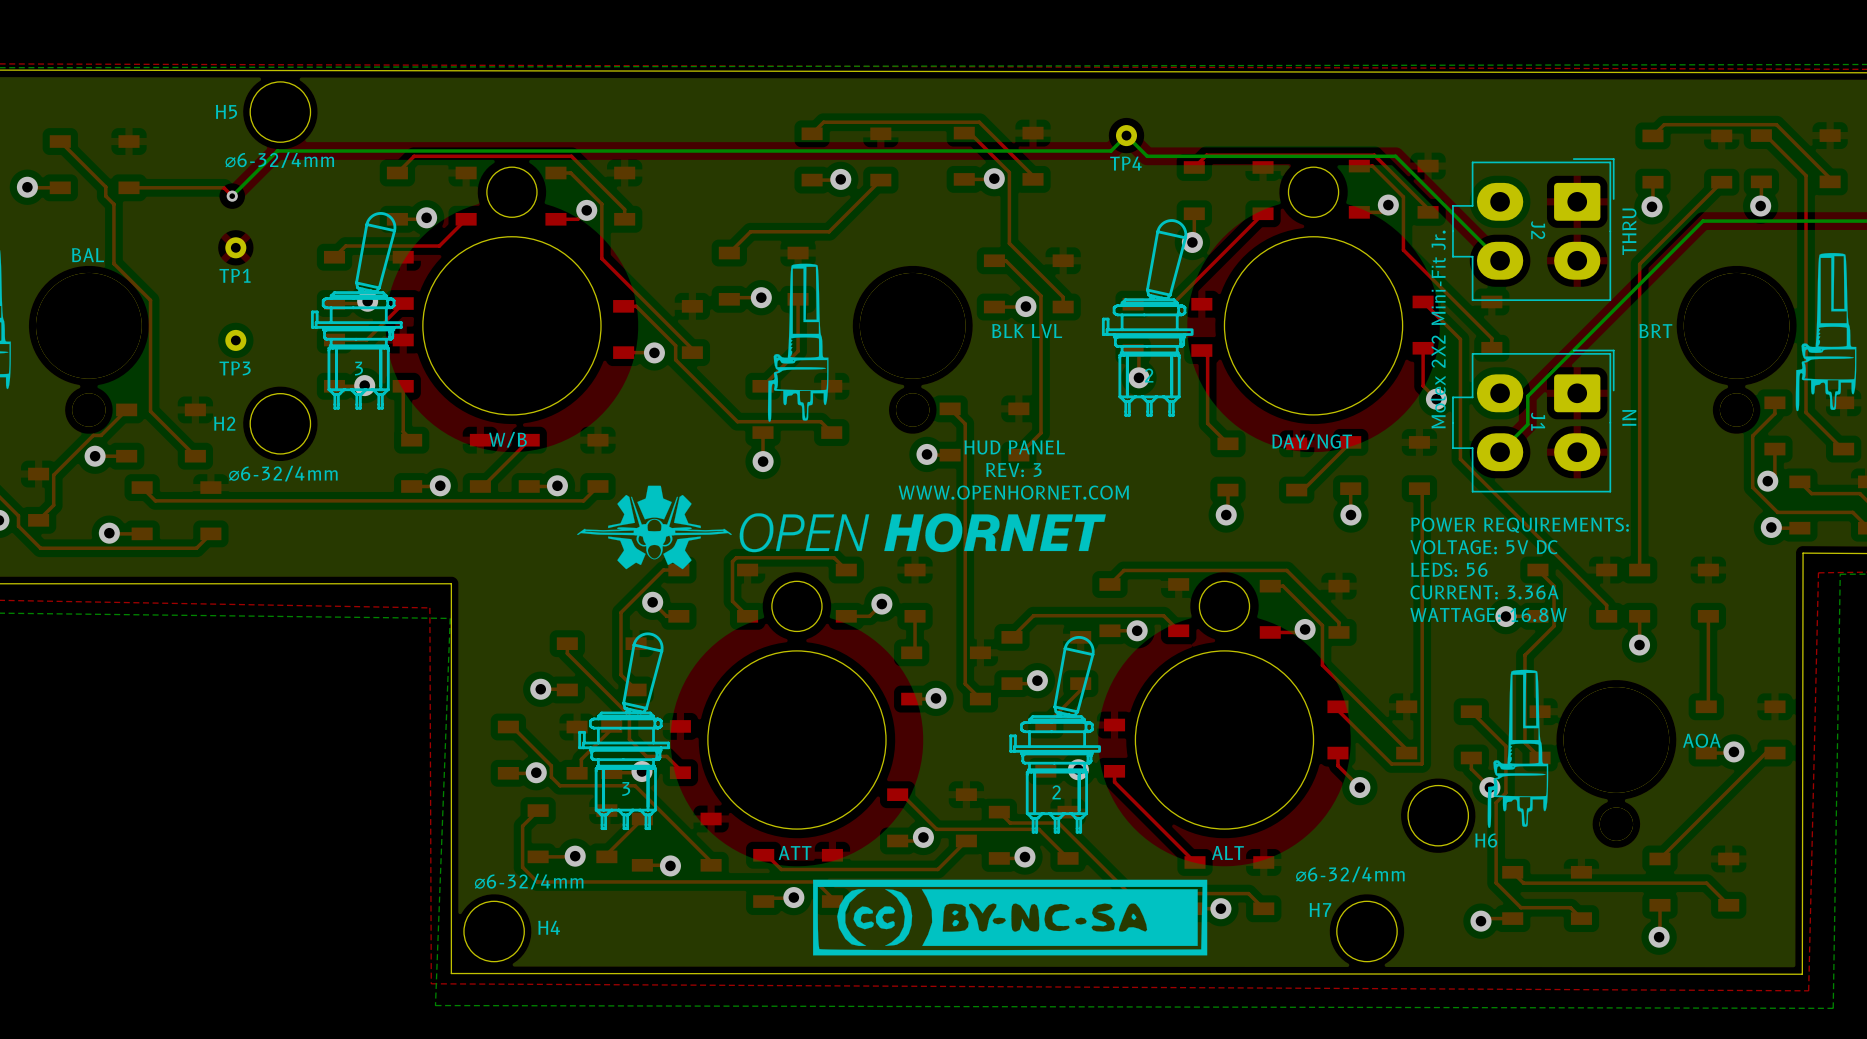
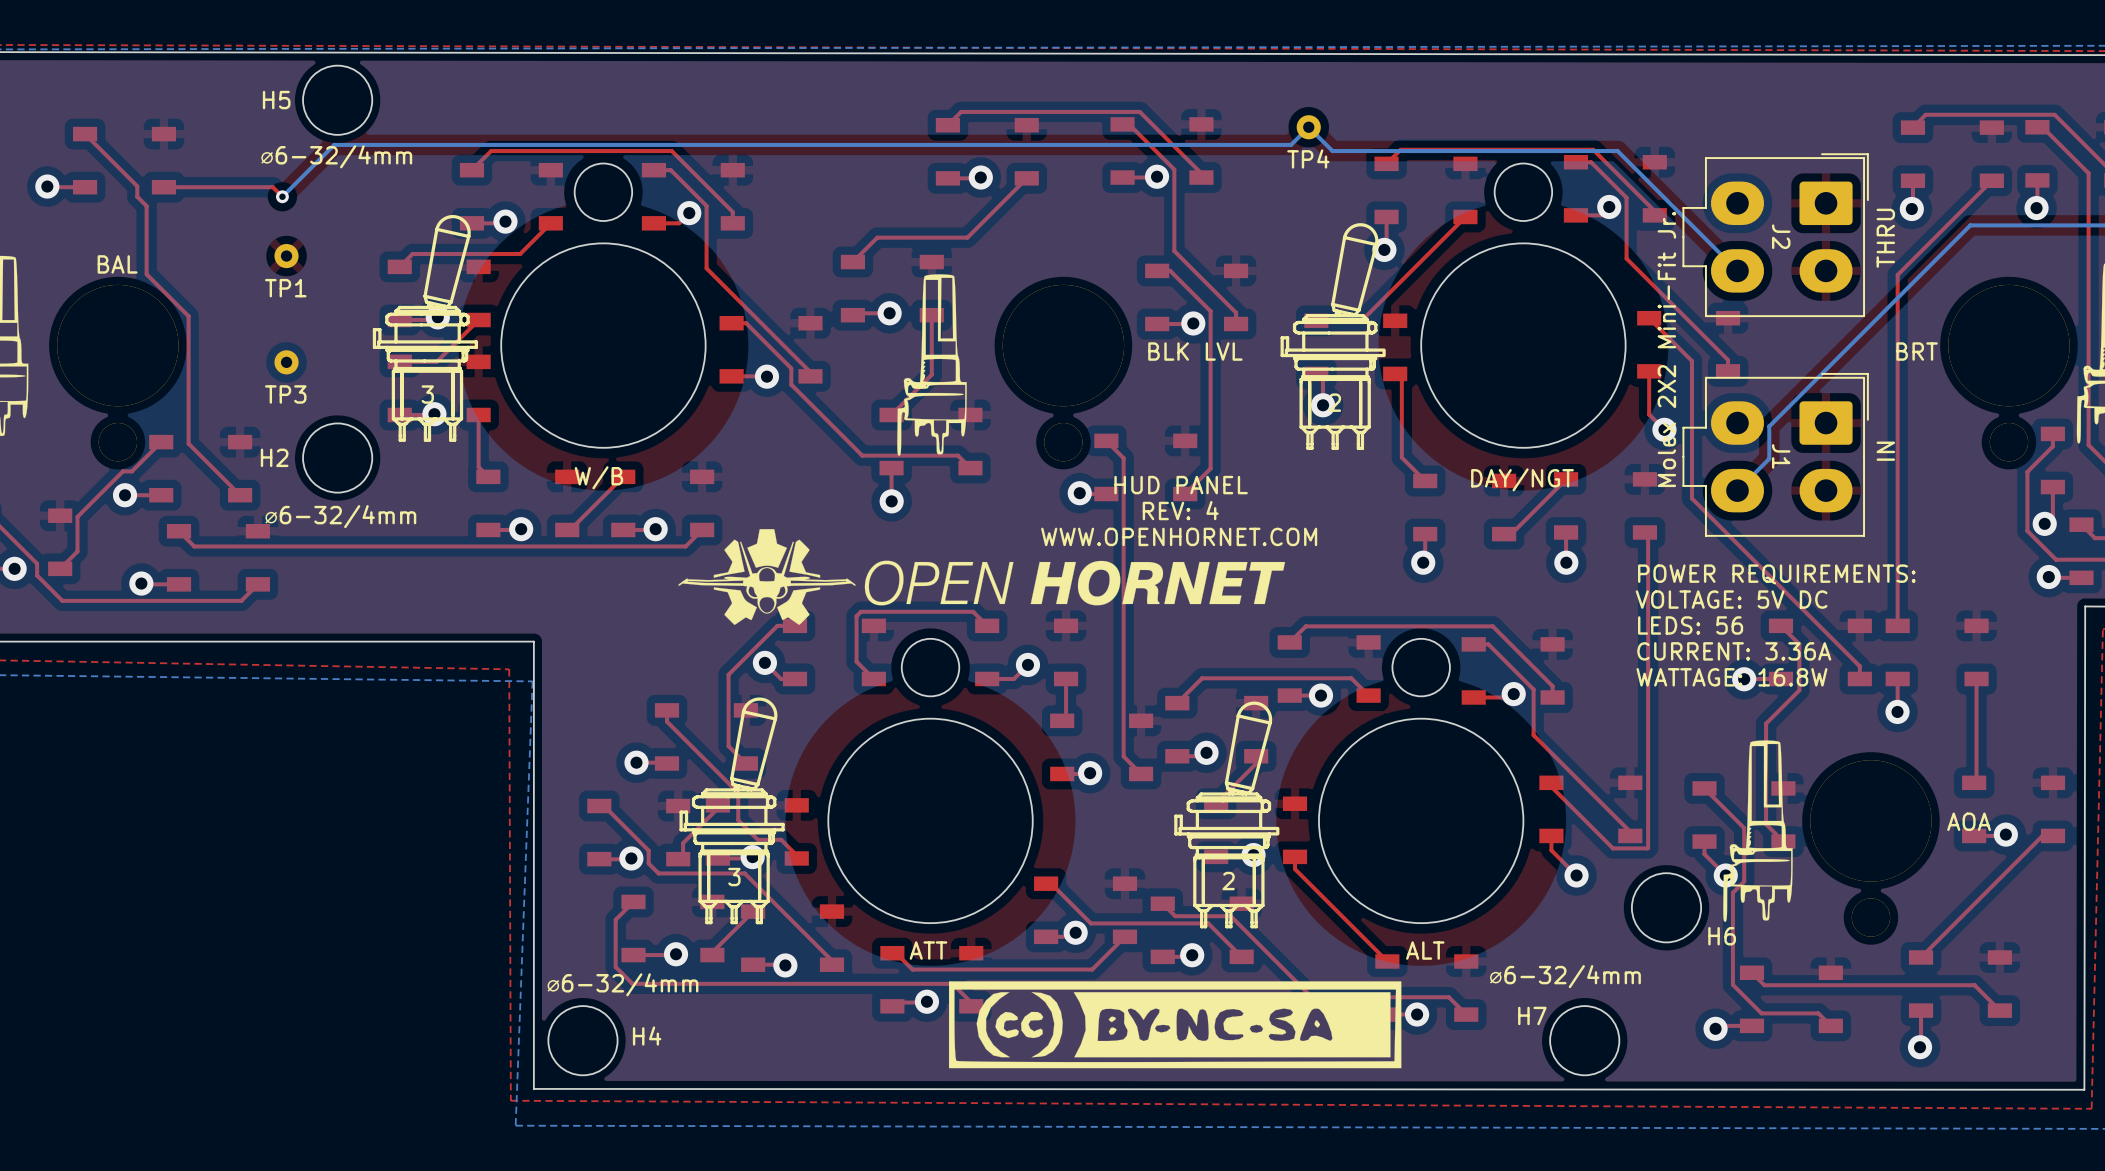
text: REV: 3 (1013, 470) -> REV: 4 (1180, 510)

